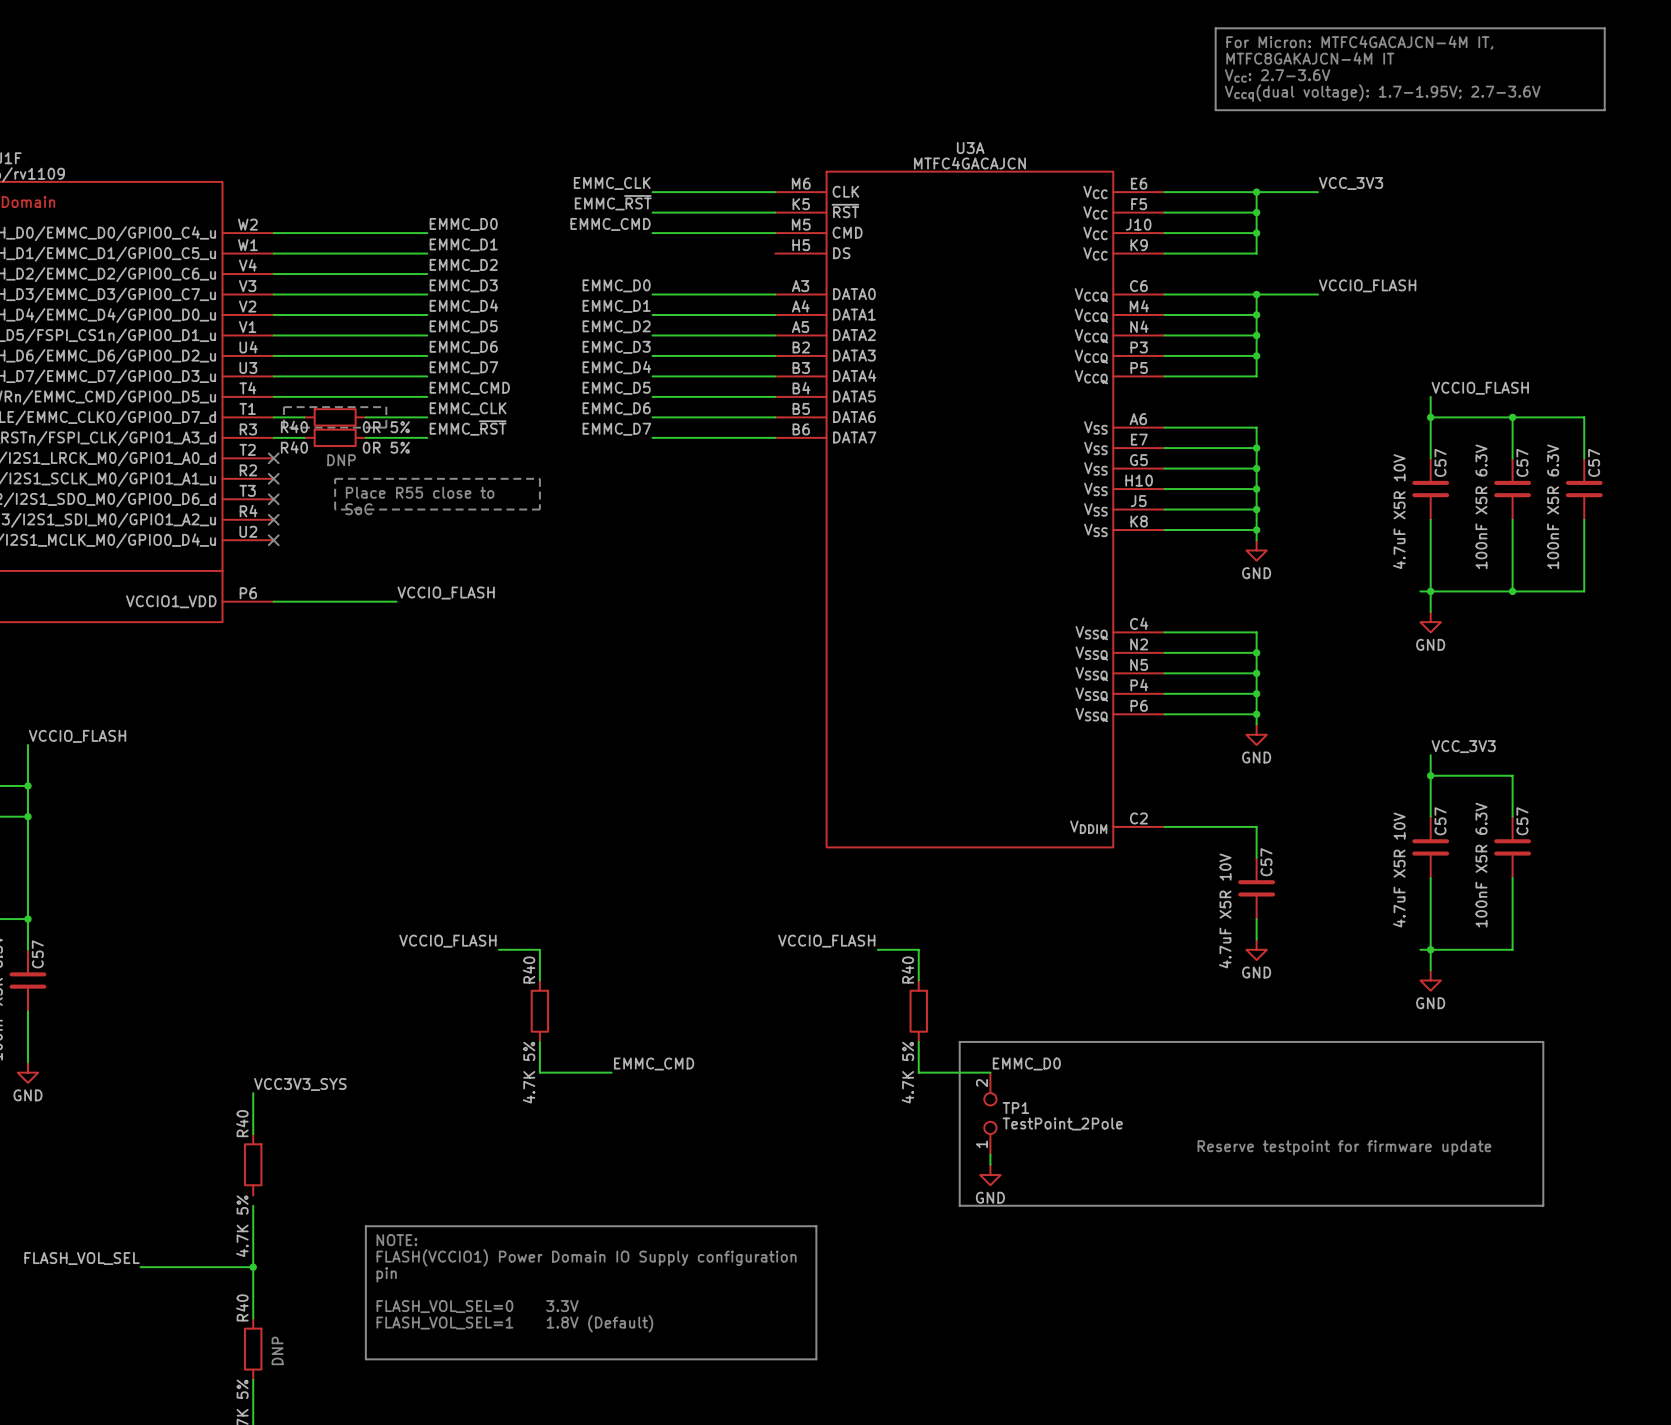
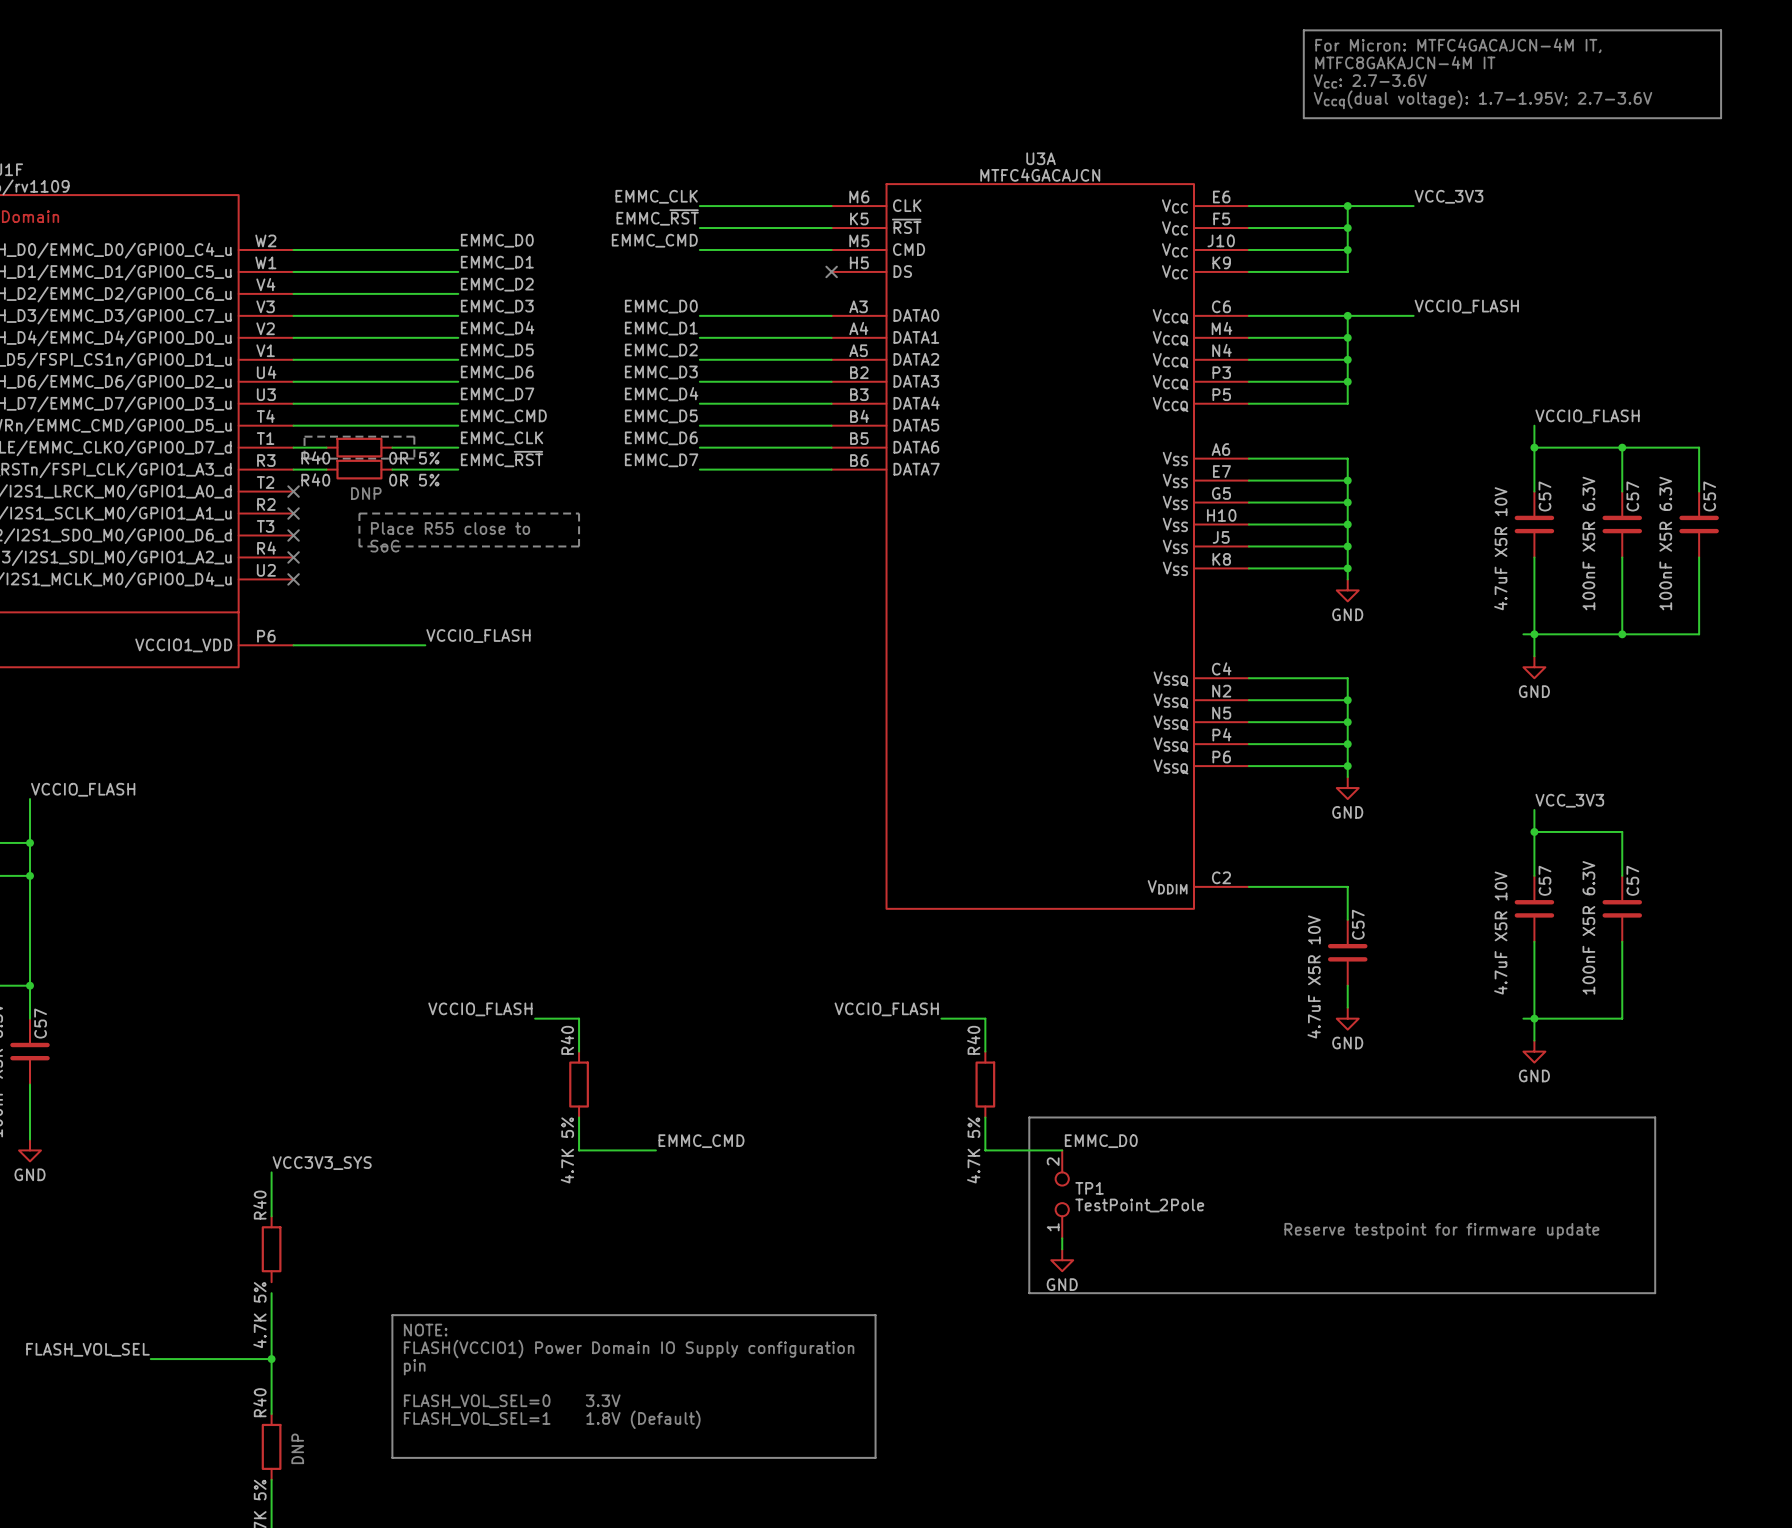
no-connect mark: none -> (831, 271)

